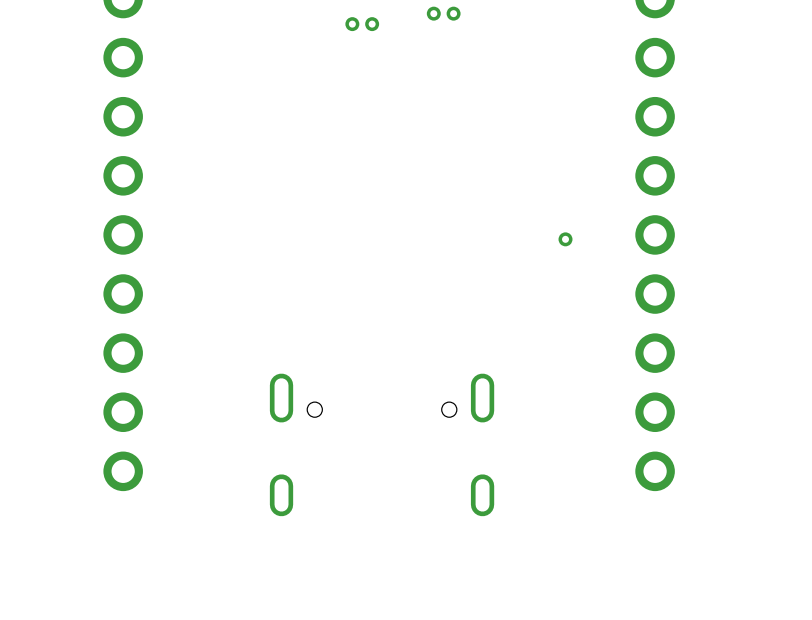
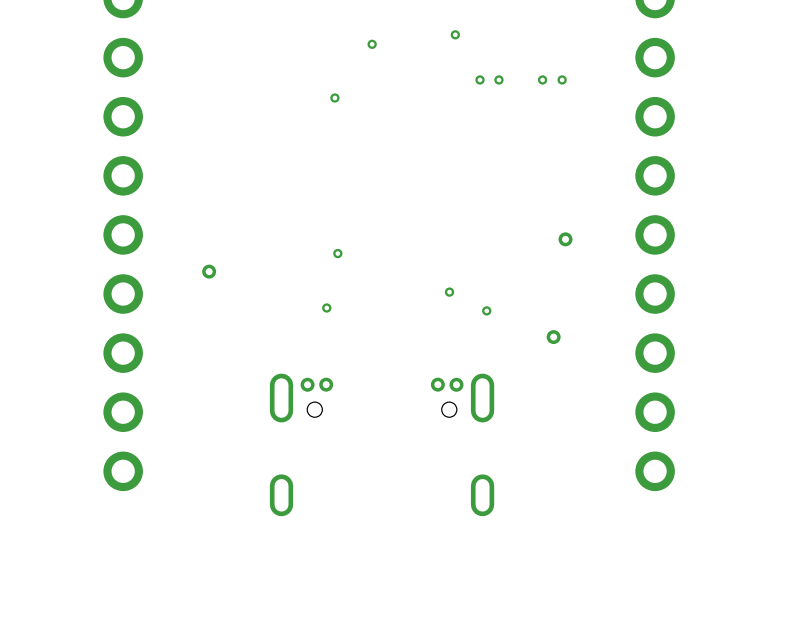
via: (433, 13) -> none
via: (453, 13) -> none
via: (352, 24) -> none
via: (372, 24) -> none
via: none -> (455, 34)
via: none -> (372, 44)
via: none -> (479, 79)
via: none -> (498, 79)
via: none -> (542, 79)
via: none -> (562, 79)
via: none -> (334, 97)
via: none -> (337, 253)
via: none -> (209, 271)
via: none -> (449, 292)
via: none -> (326, 307)
via: none -> (486, 310)
via: none -> (553, 337)
via: none -> (307, 384)
via: none -> (326, 384)
via: none -> (437, 384)
via: none -> (456, 384)

